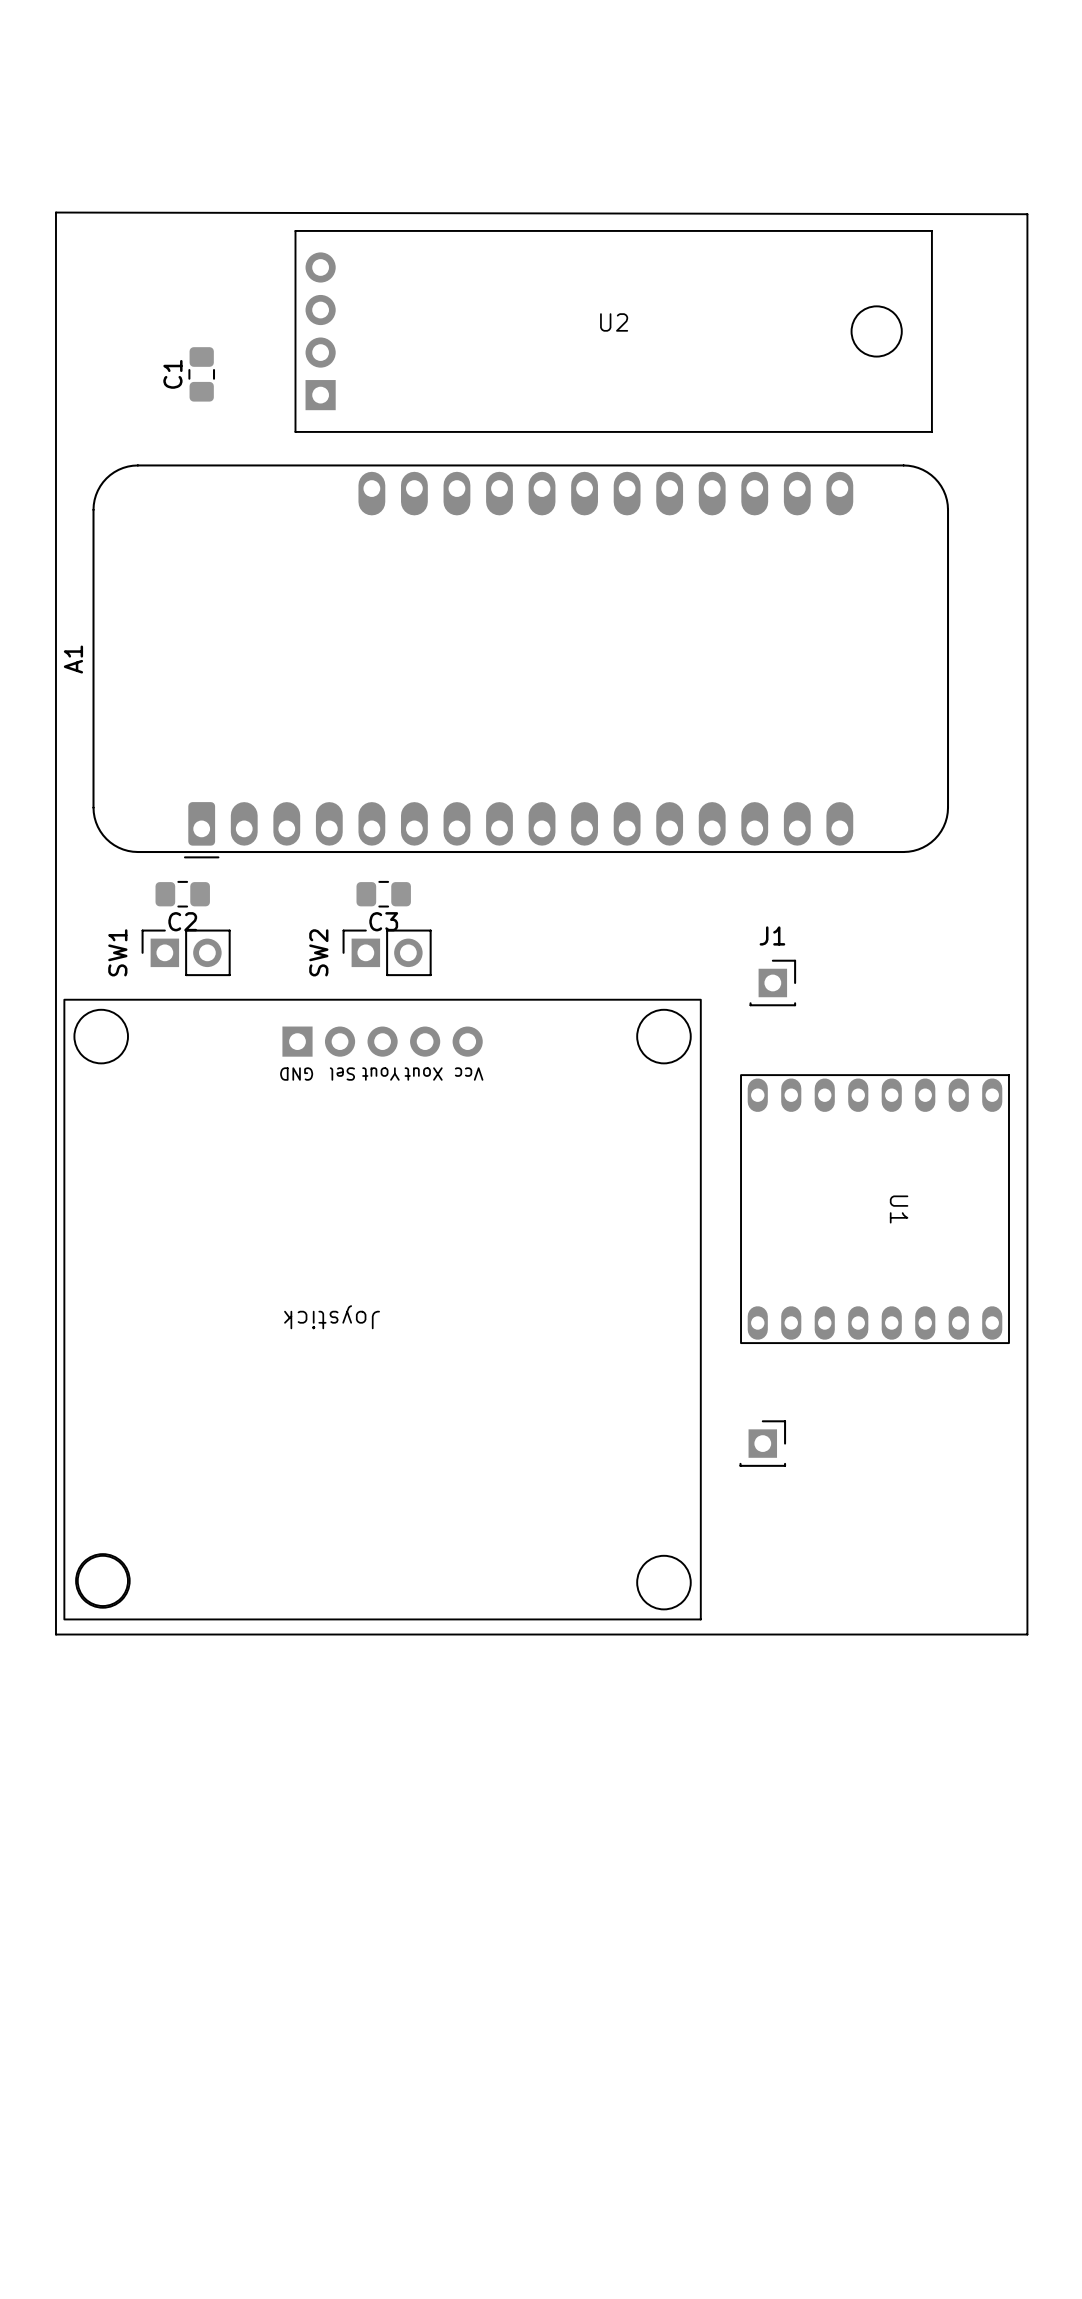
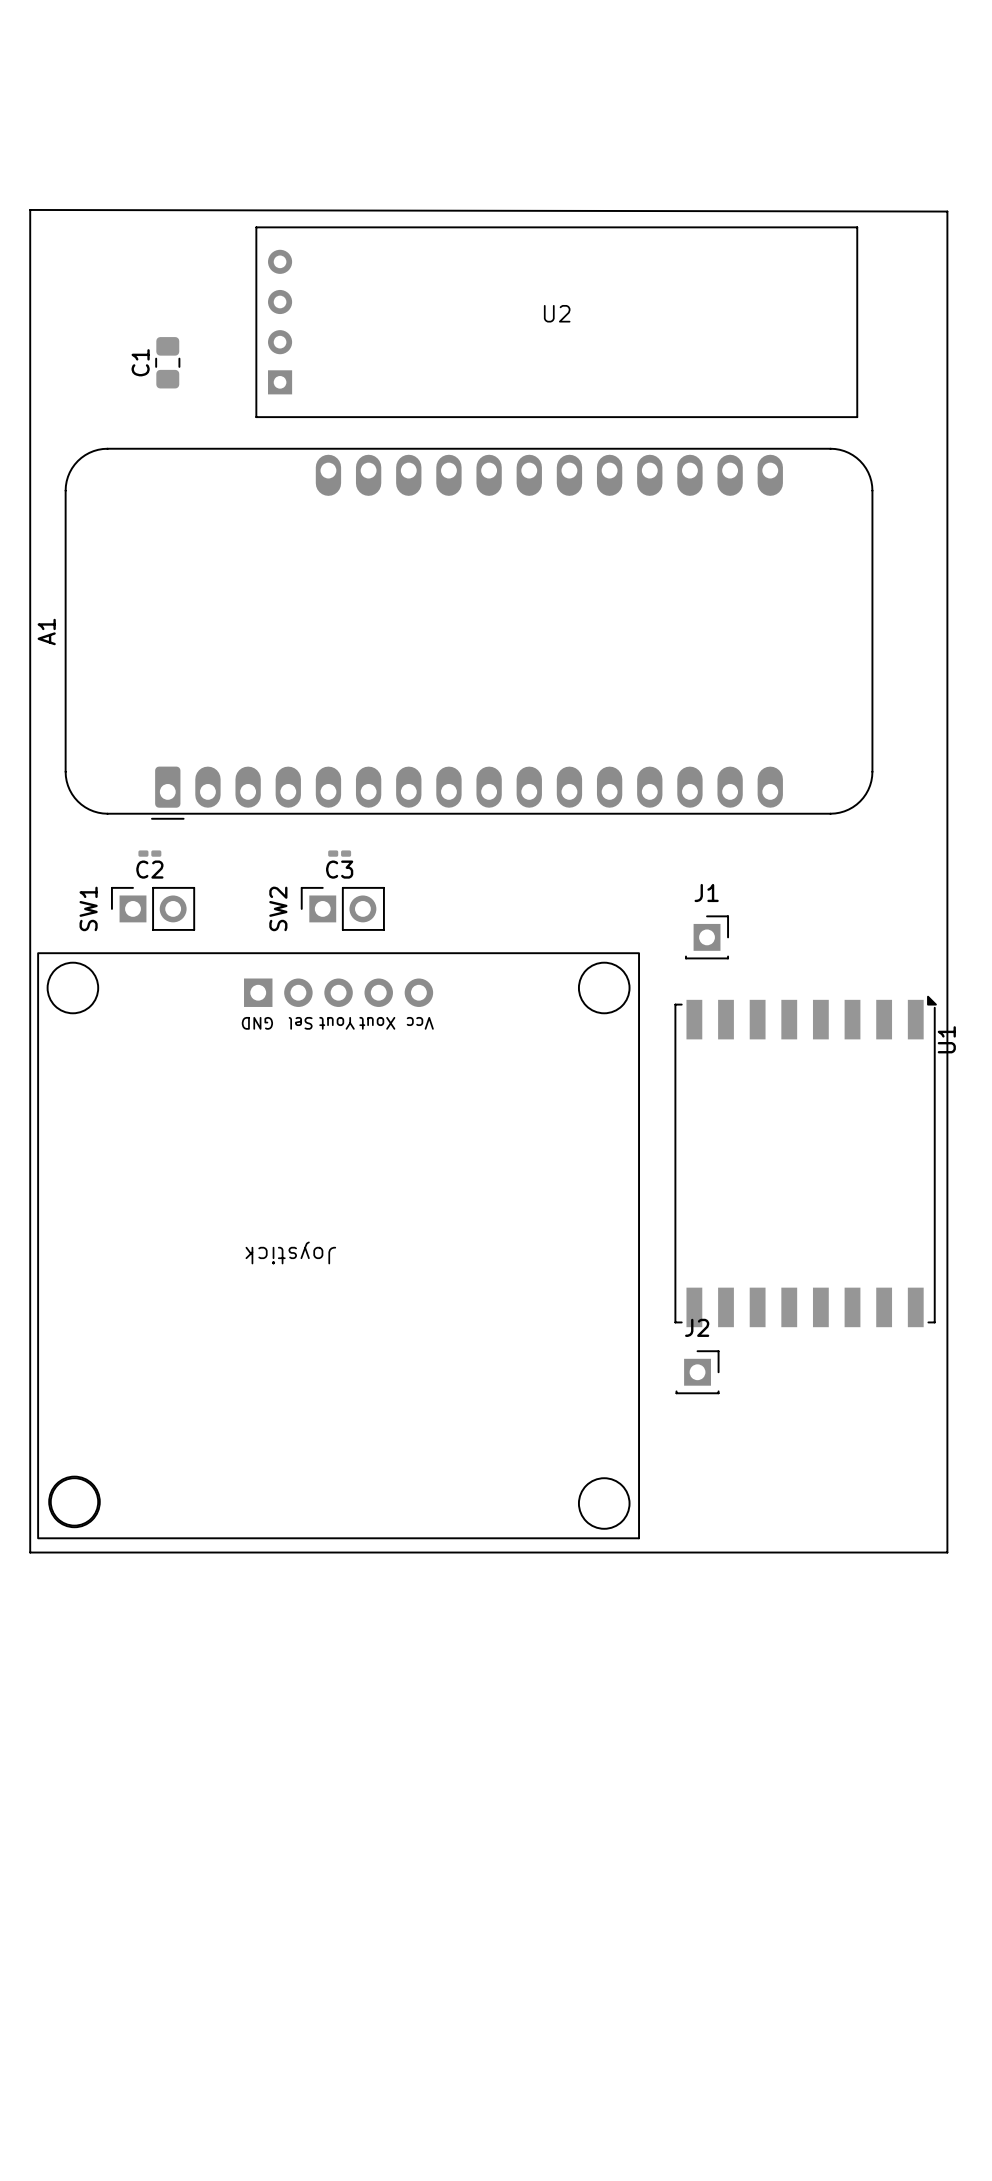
U2 footprint: [294, 230, 933, 433] -> [255, 226, 859, 418]
C2 footprint: [155, 880, 210, 908] -> [138, 850, 162, 857]
C3 footprint: [356, 880, 411, 908] -> [328, 850, 352, 857]
U1 footprint: [740, 1074, 1010, 1344] -> [674, 995, 937, 1328]
U1 name position: U1 (899, 1209) -> U1 (946, 1039)
J2 name: none -> J2 (697, 1327)

